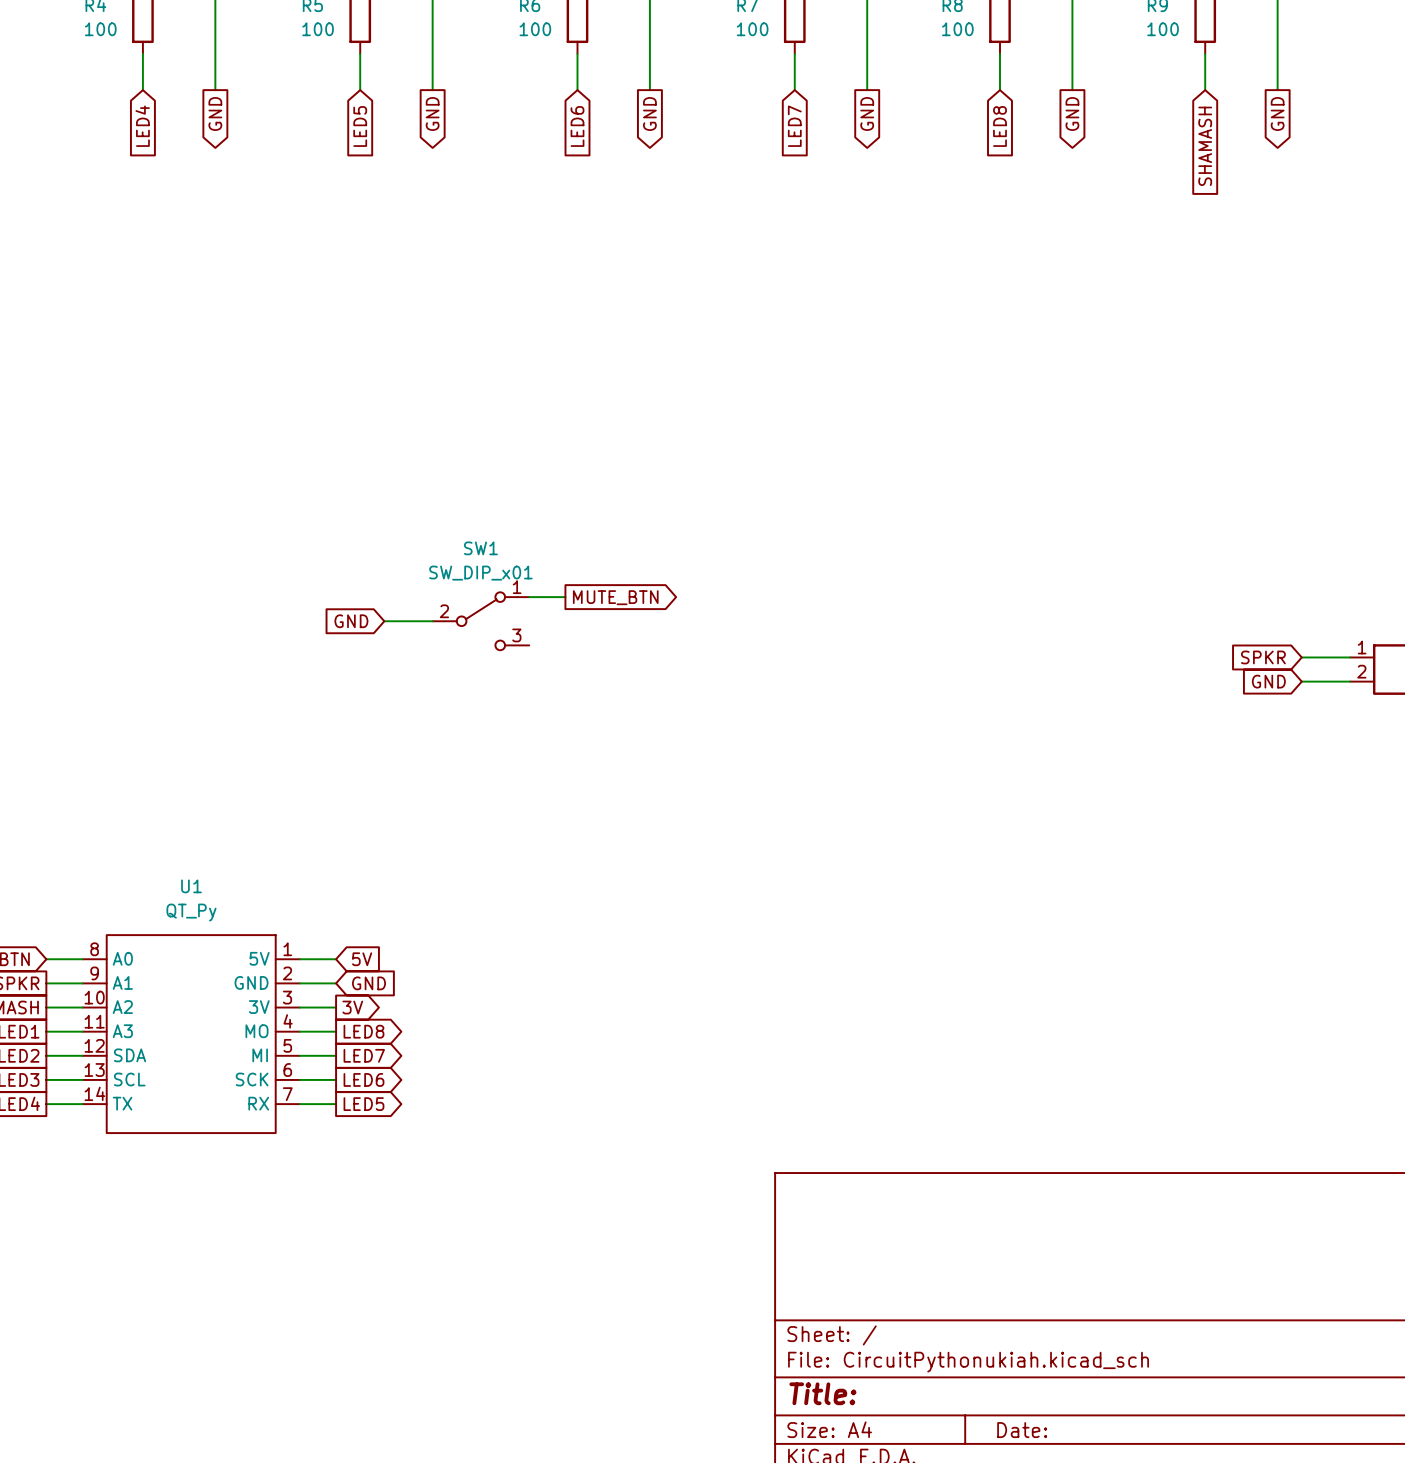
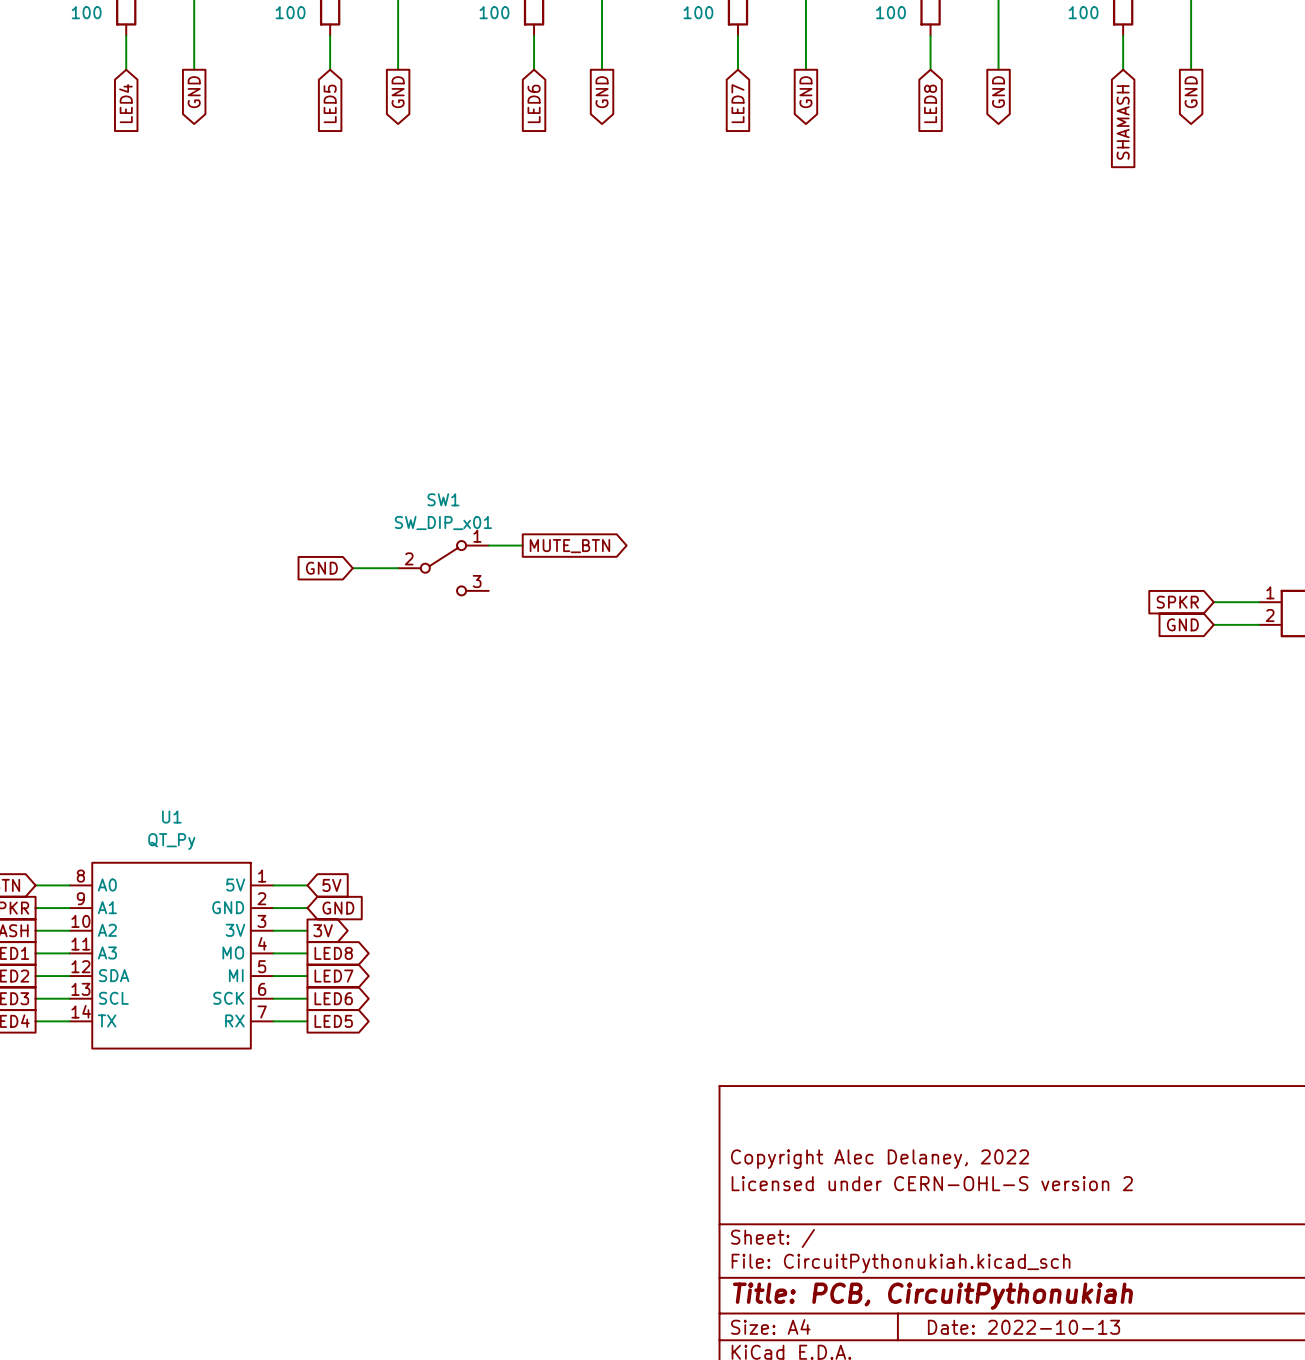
title block: none -> Copyright Alec Delaney, 2022 (880, 1159)
title block: none -> Licensed under CERN-OHL-S version 2 (932, 1183)
title block: Title: (822, 1393) -> Title: PCB, CircuitPythonukiah (932, 1296)
title block: Date: (1022, 1430) -> Date: 2022-10-13 (1024, 1327)

